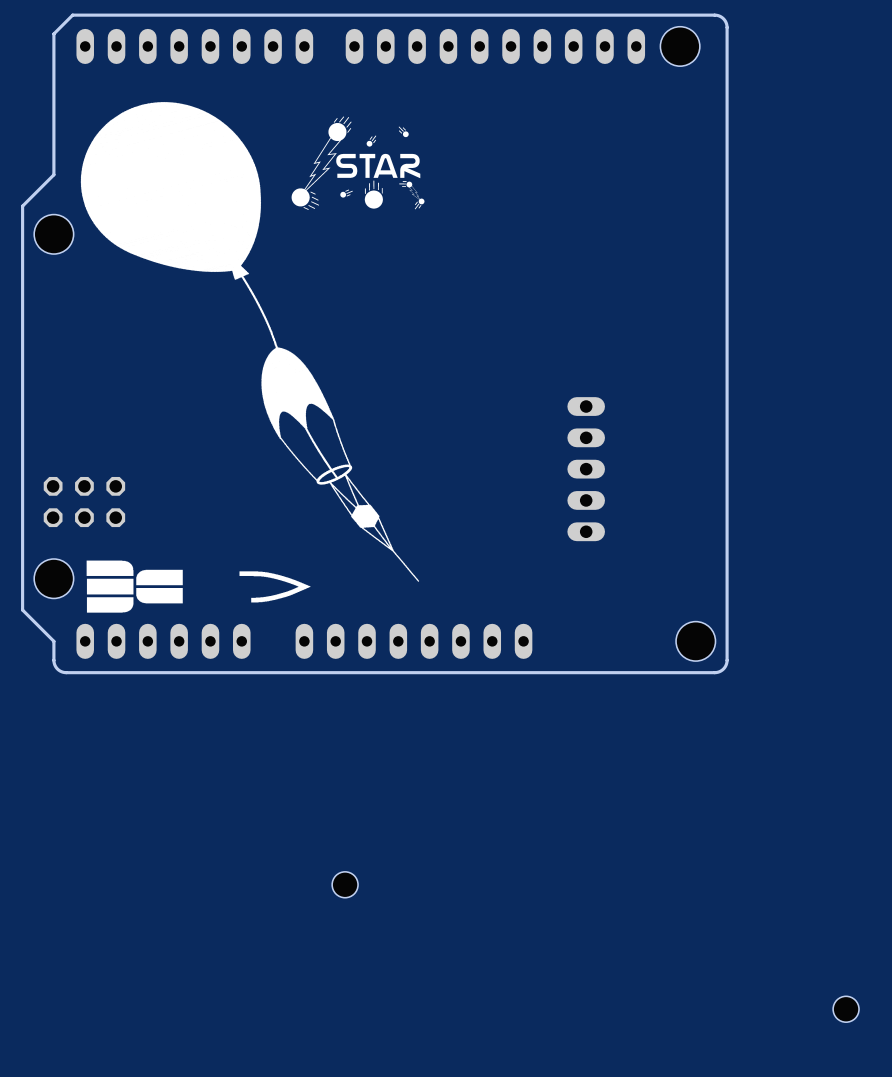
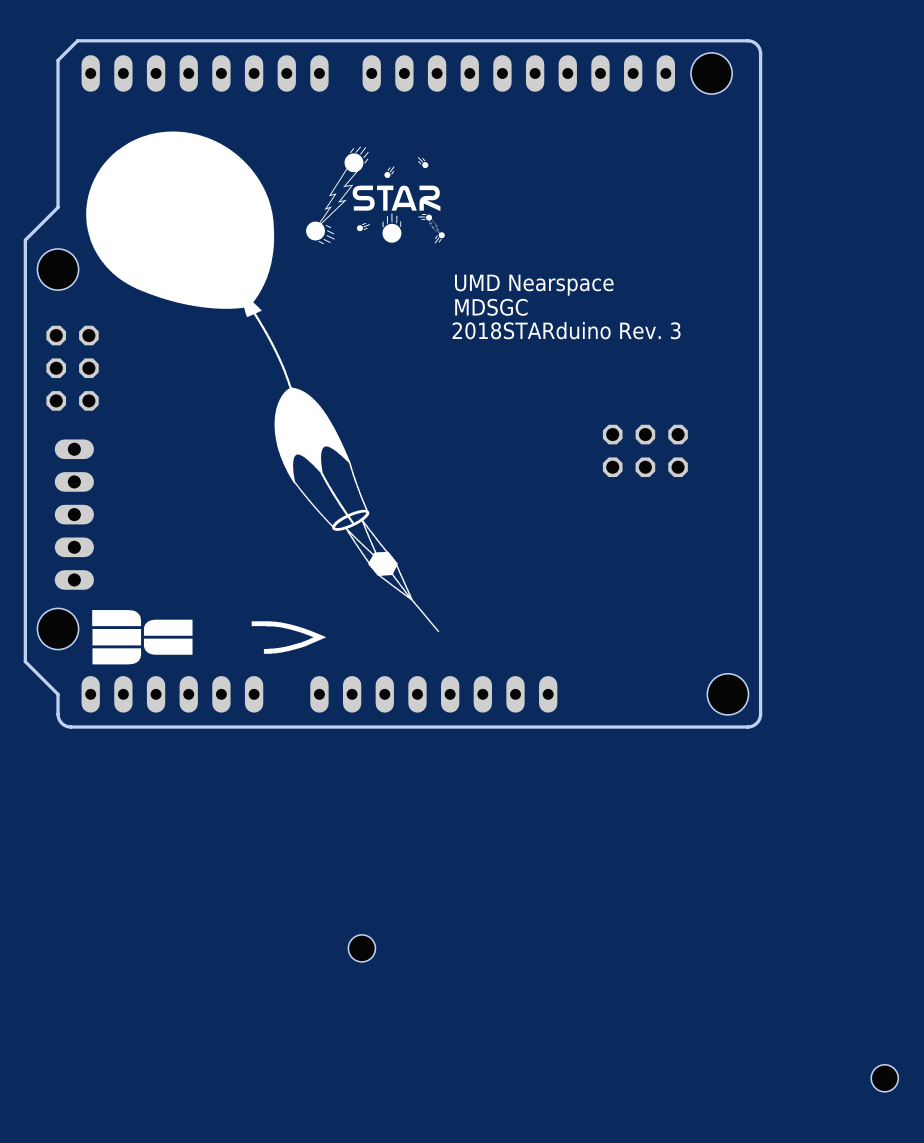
text: none -> UMD Nearspace (534, 285)
text: none -> MDSGC (491, 307)
text: none -> 2018STARduino Rev. 3 (566, 330)
part: none -> (645, 450)
part: none -> (74, 514)
part: (586, 469) -> none
part rotation: 0° (84, 502) -> 90° clockwise (72, 368)
part position: (84, 502) -> (72, 368)

